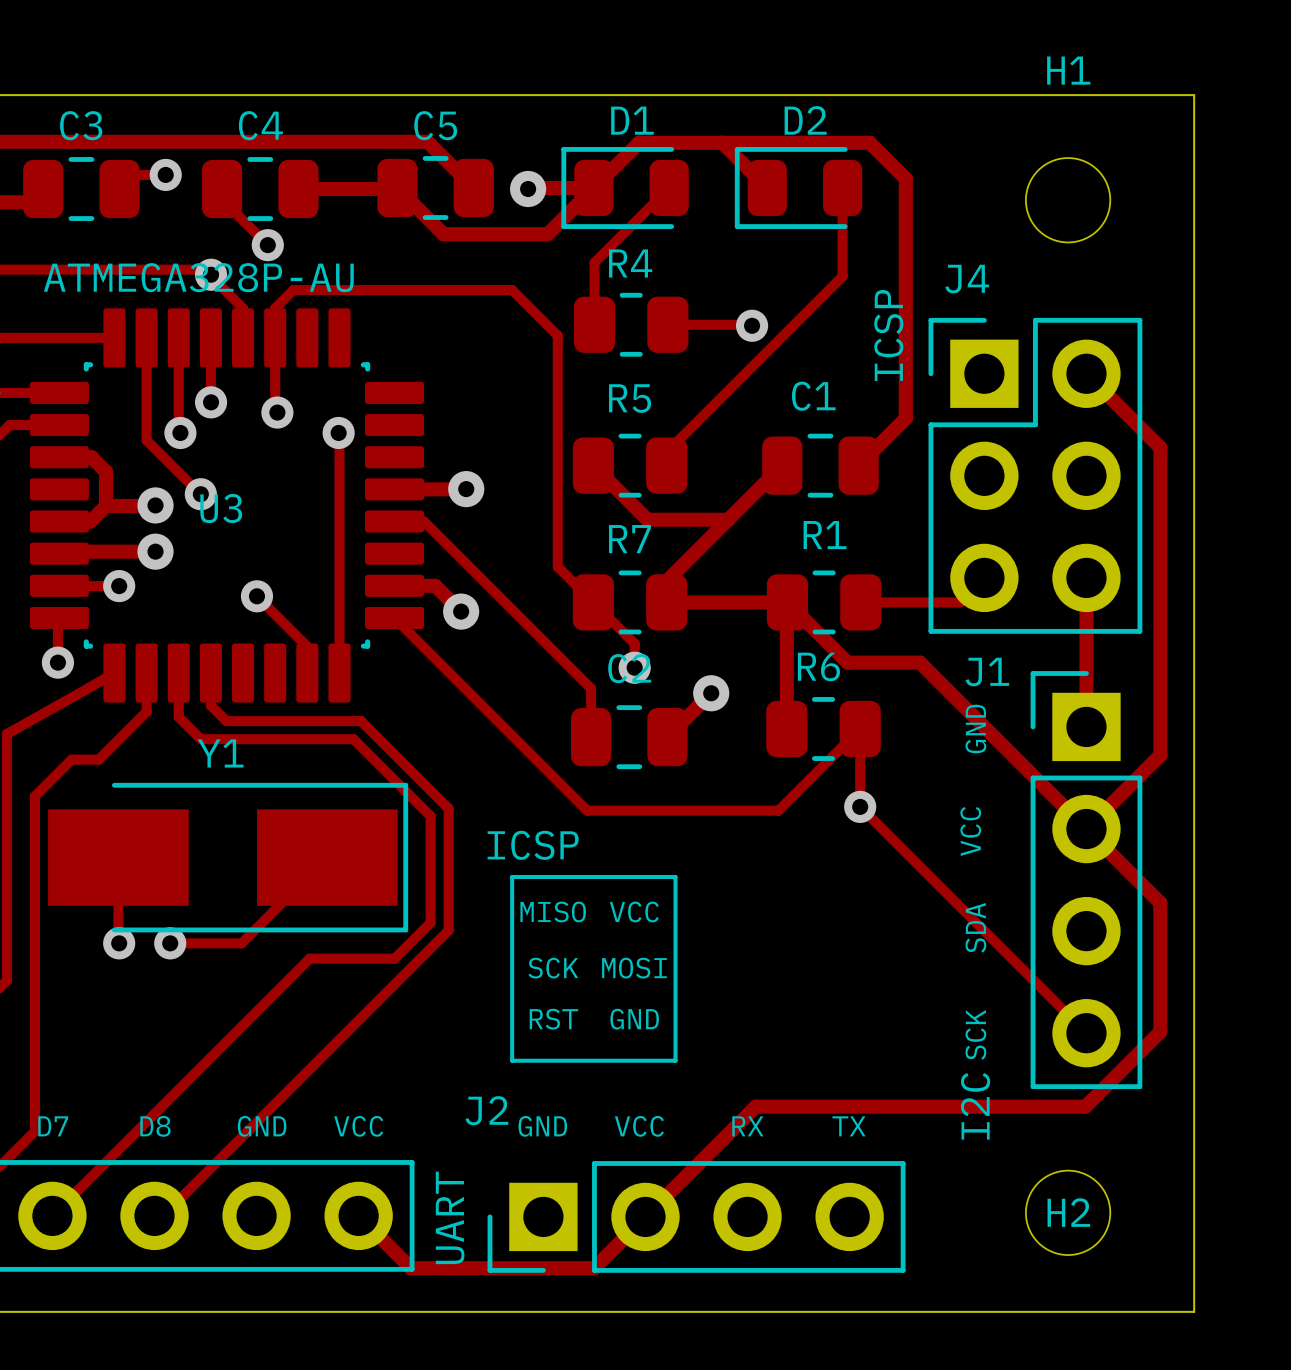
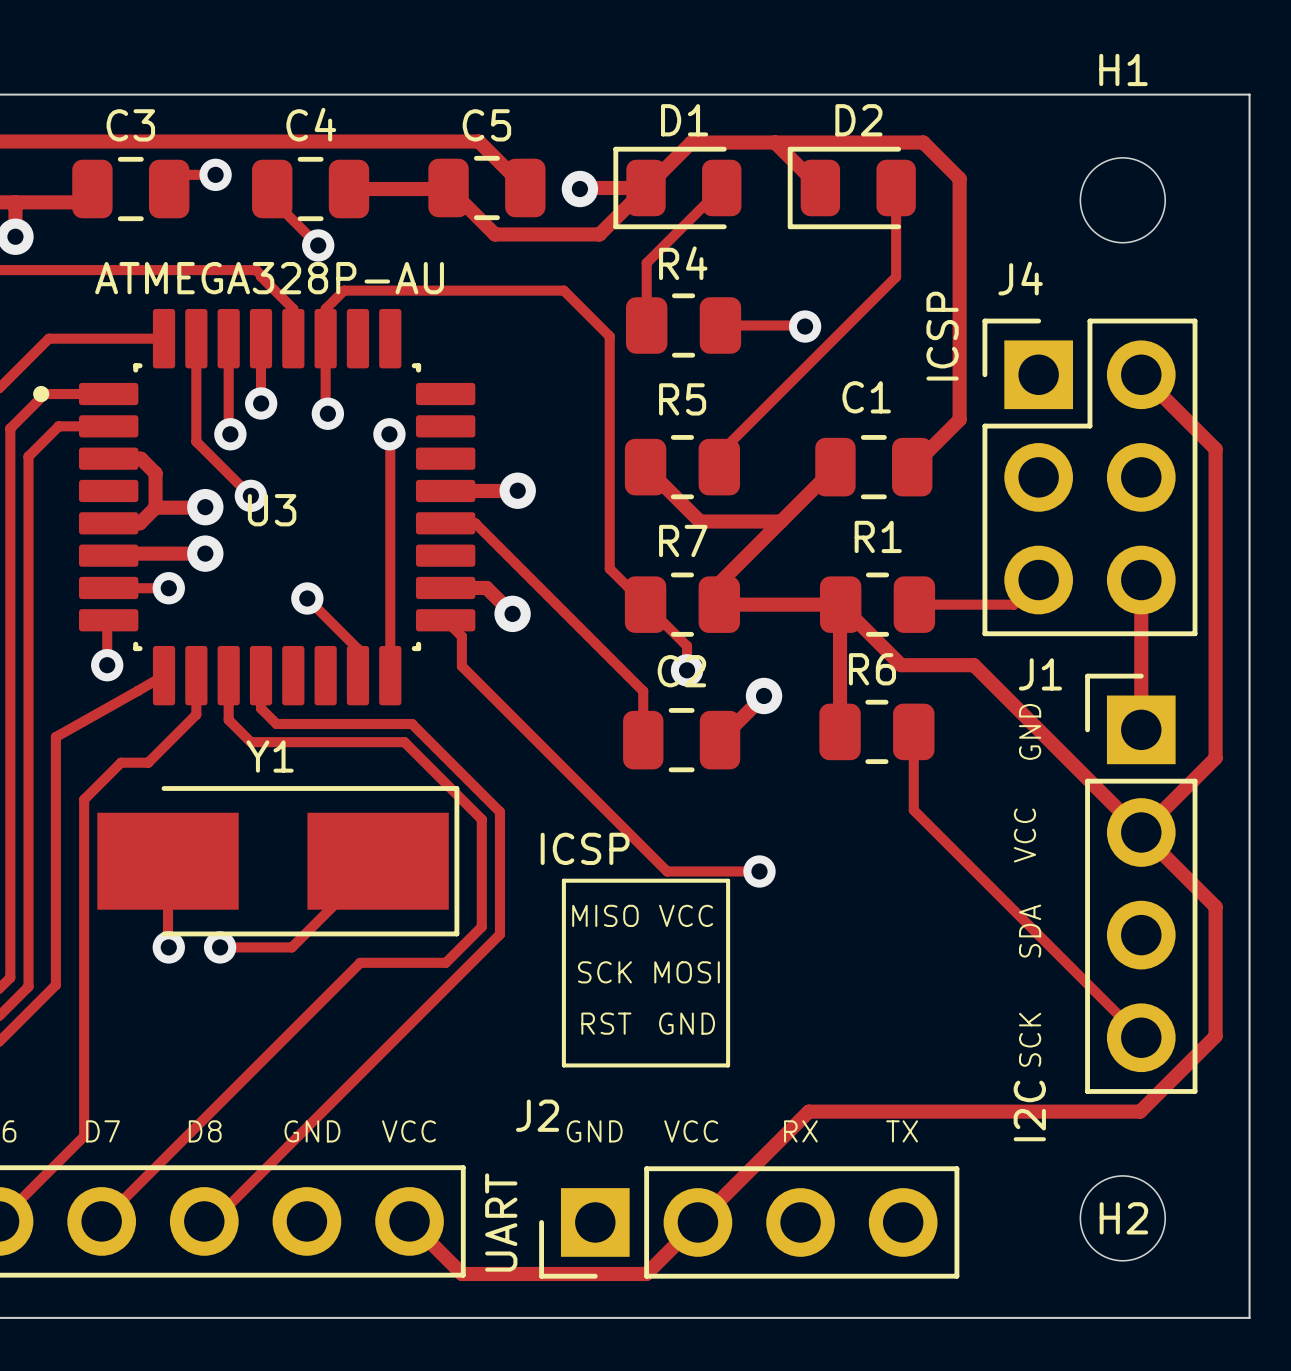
via: (211, 274) -> none
track: (410, 634) (587, 810) (778, 810) (860, 728) -> (461, 636) (461, 666) (667, 871) (759, 871)
via position: (860, 806) -> (759, 871)

